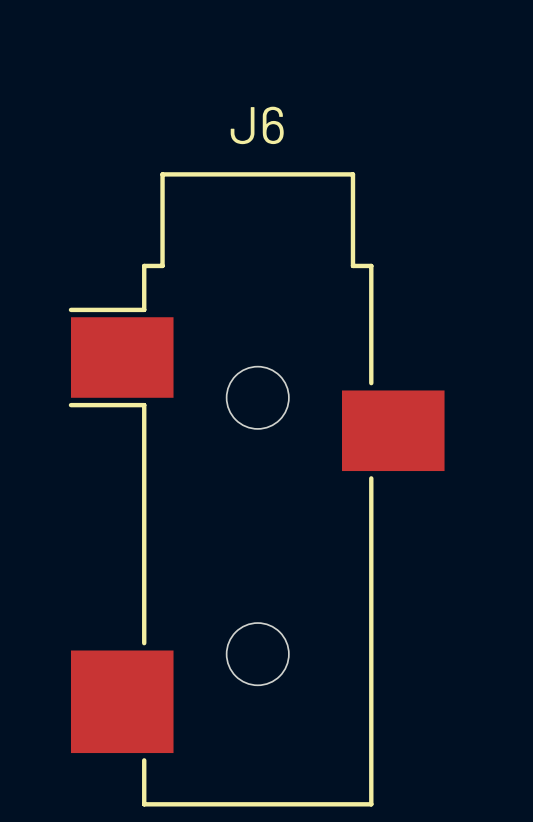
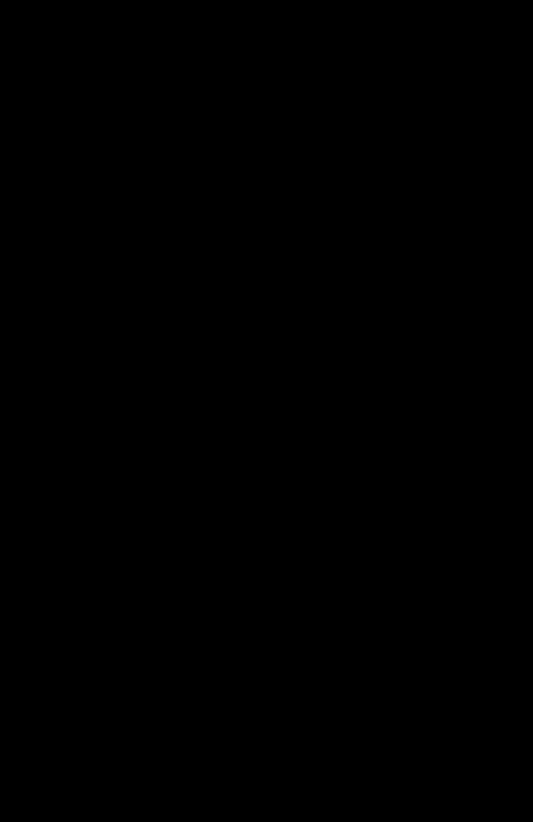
J6: (256, 489) -> none

